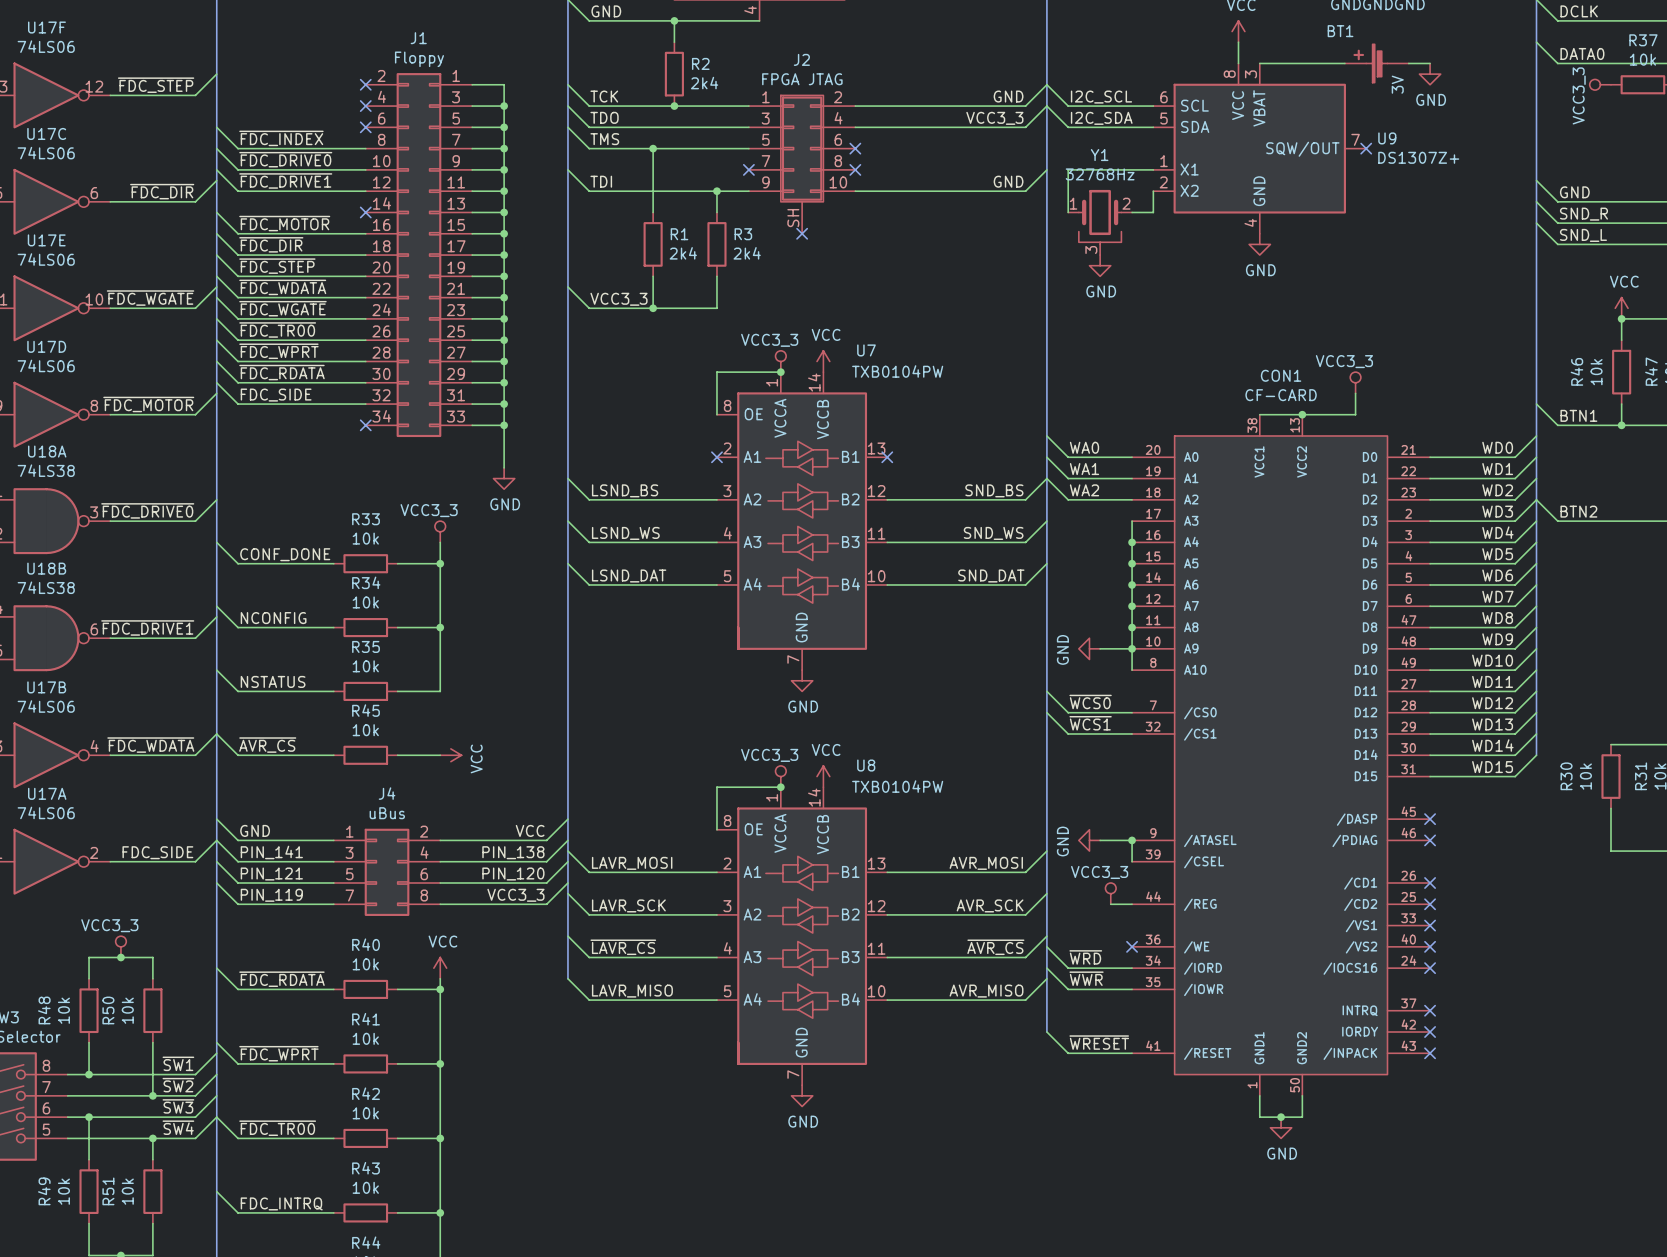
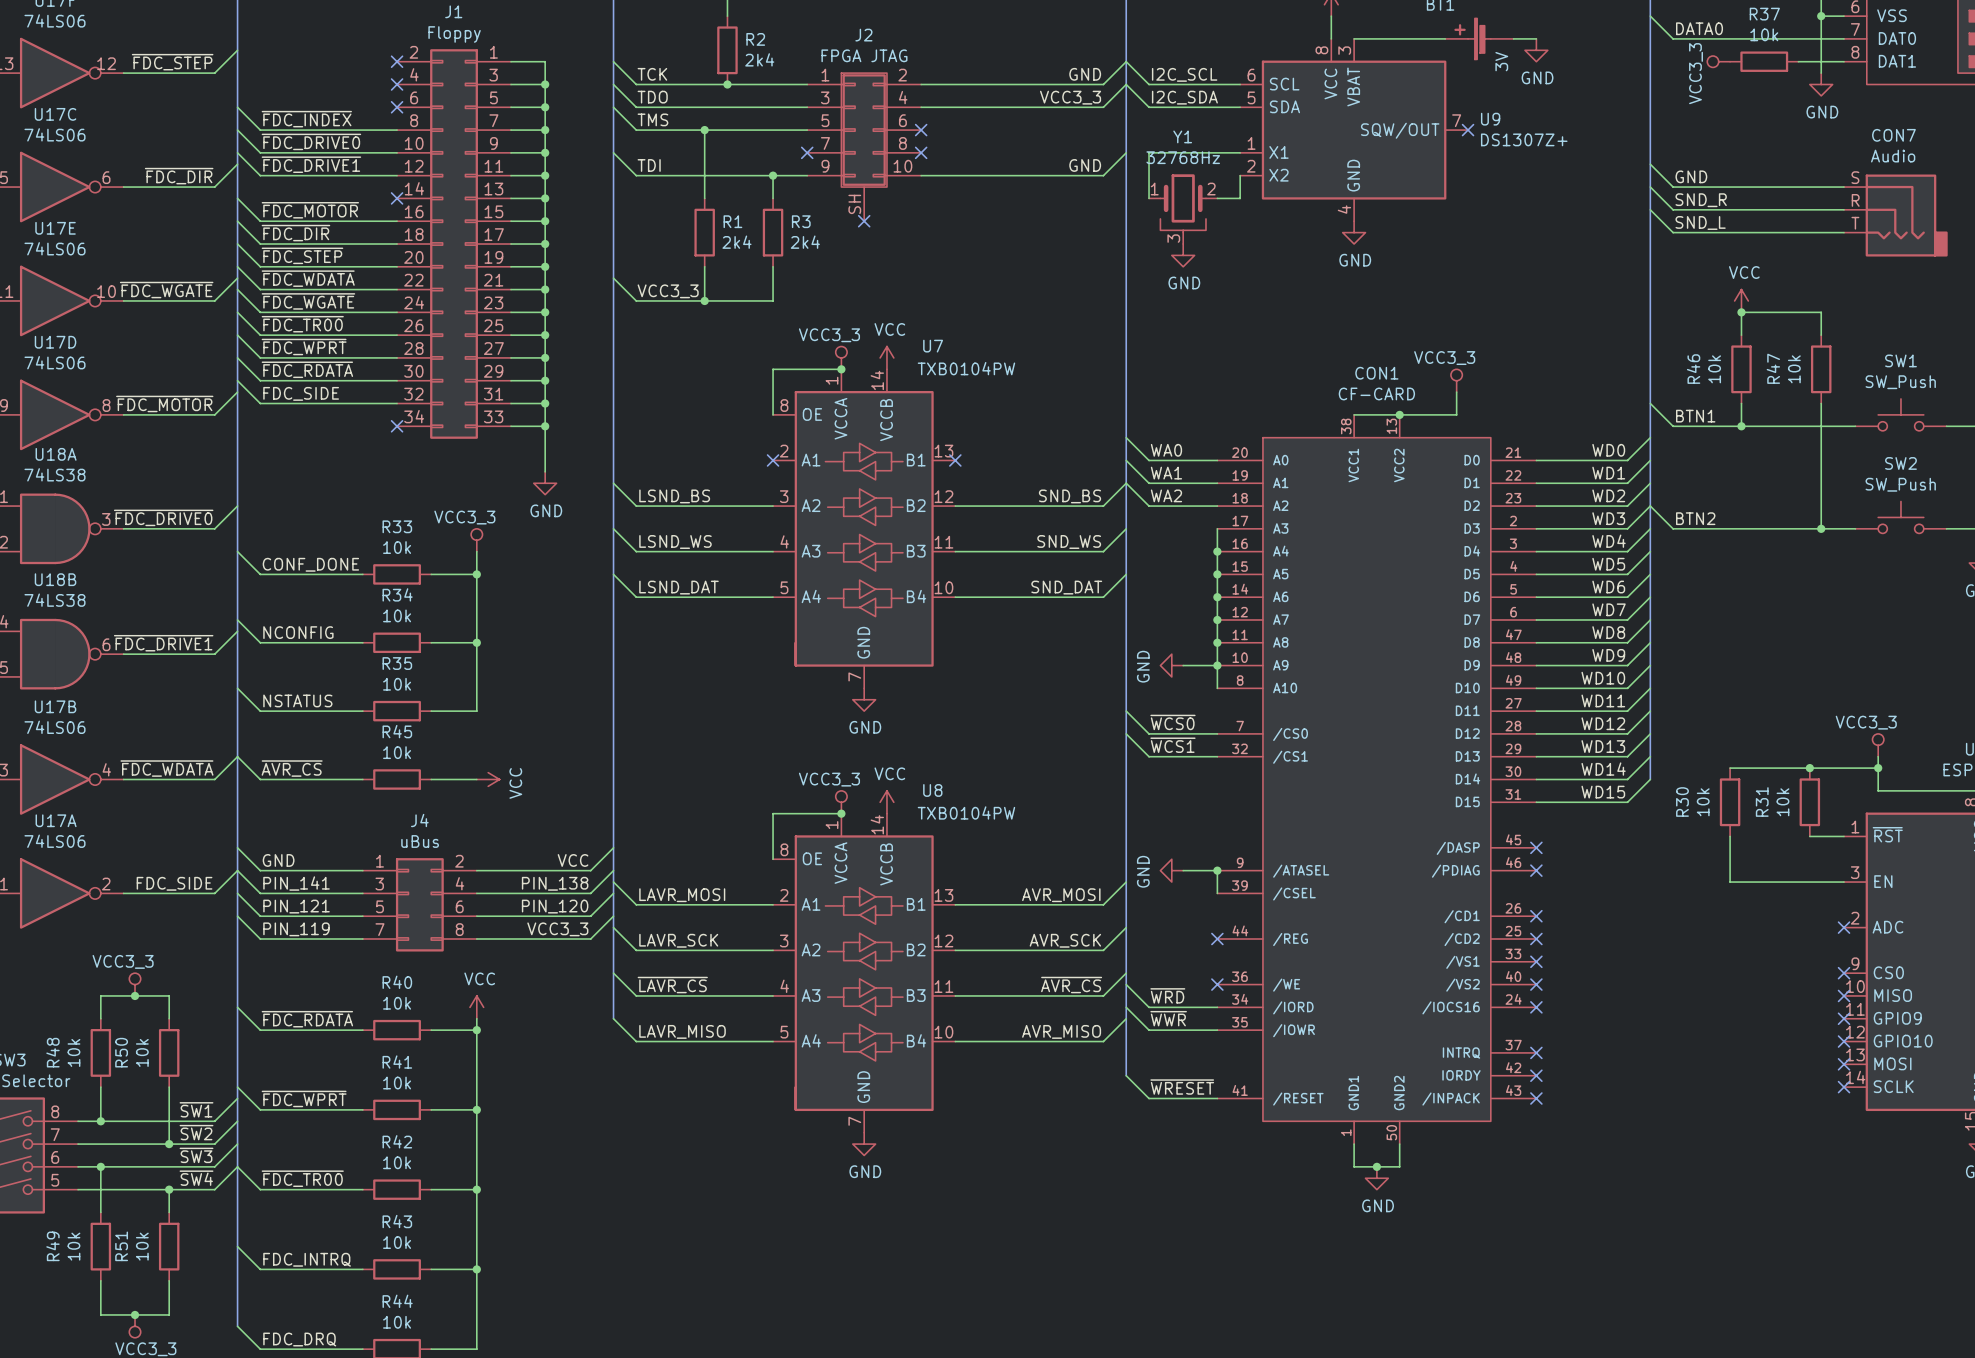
power symbol: VCC3_3 (1110, 893) -> none
wire: (1110, 904) (1132, 904) -> none
no-connect mark: none -> (1217, 939)

